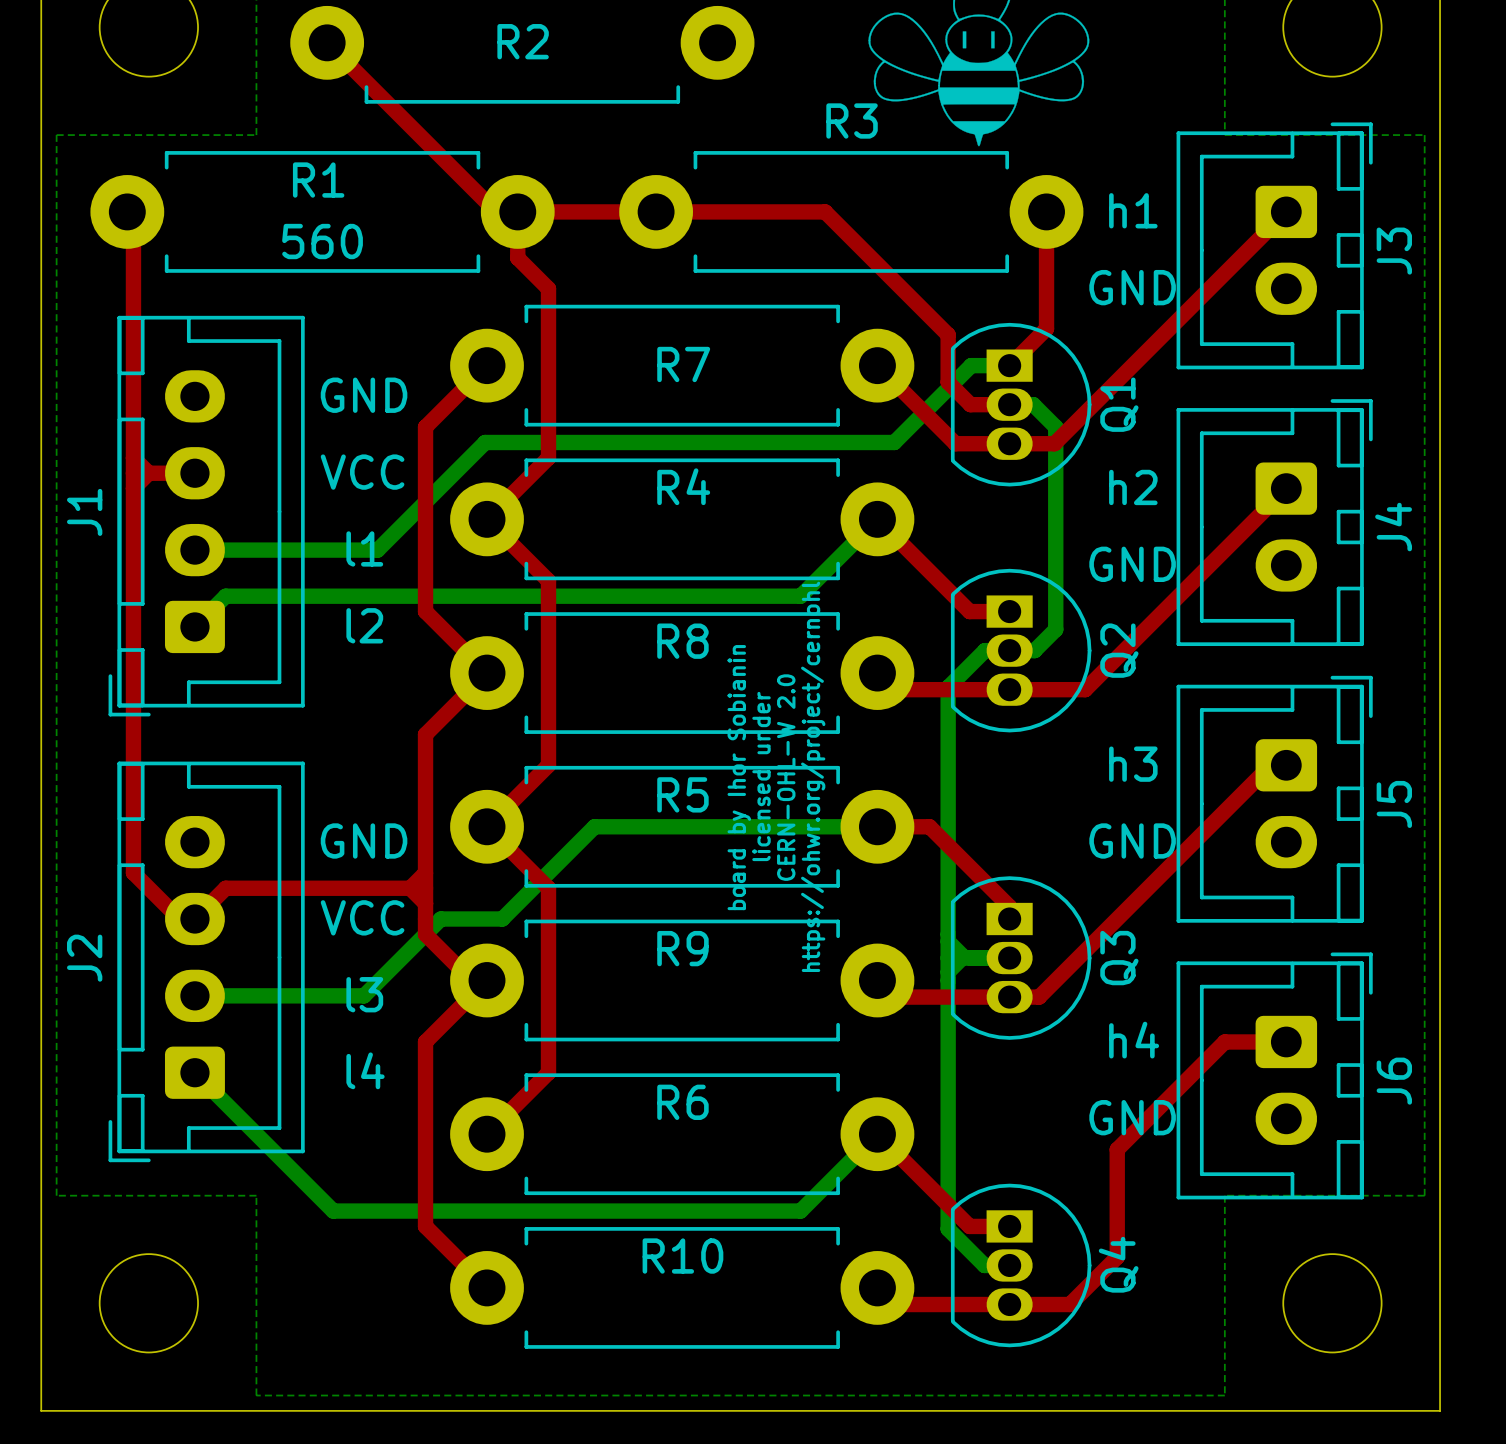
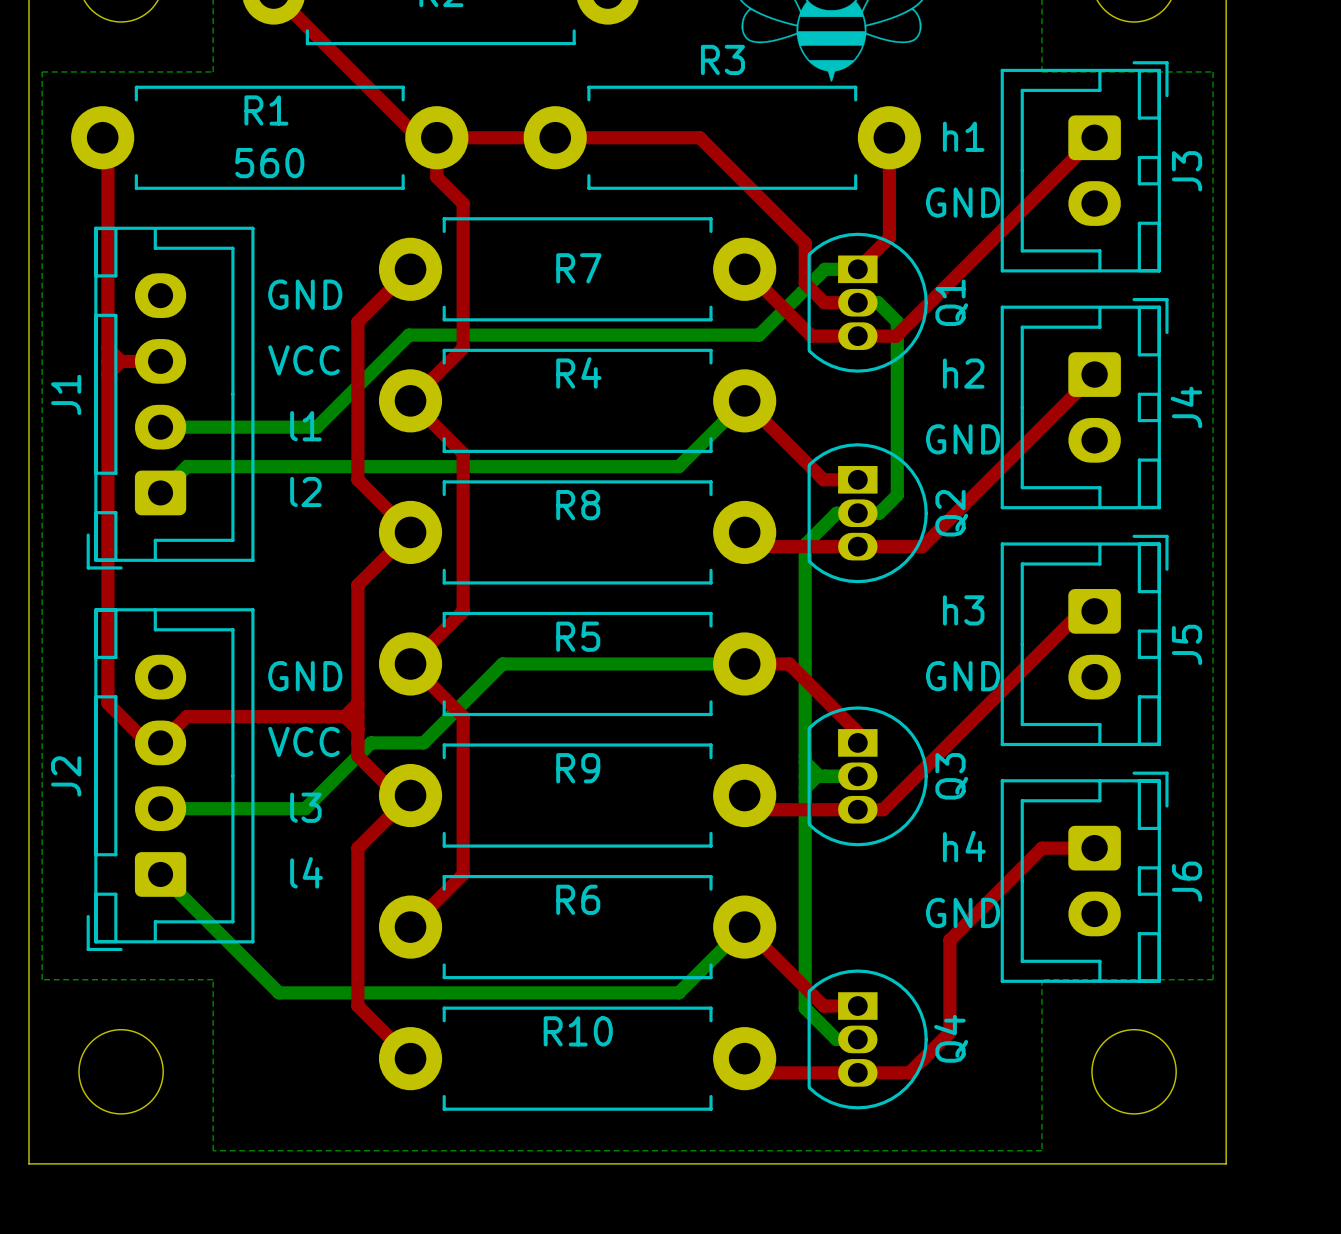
text: licensed under (761, 776) -> none
text: https://ohwr.org/project/cernohl (813, 776) -> none
text: board by Ihor Sobianin (739, 777) -> none
text: CERN-OHL-W 2.0 (786, 777) -> none

